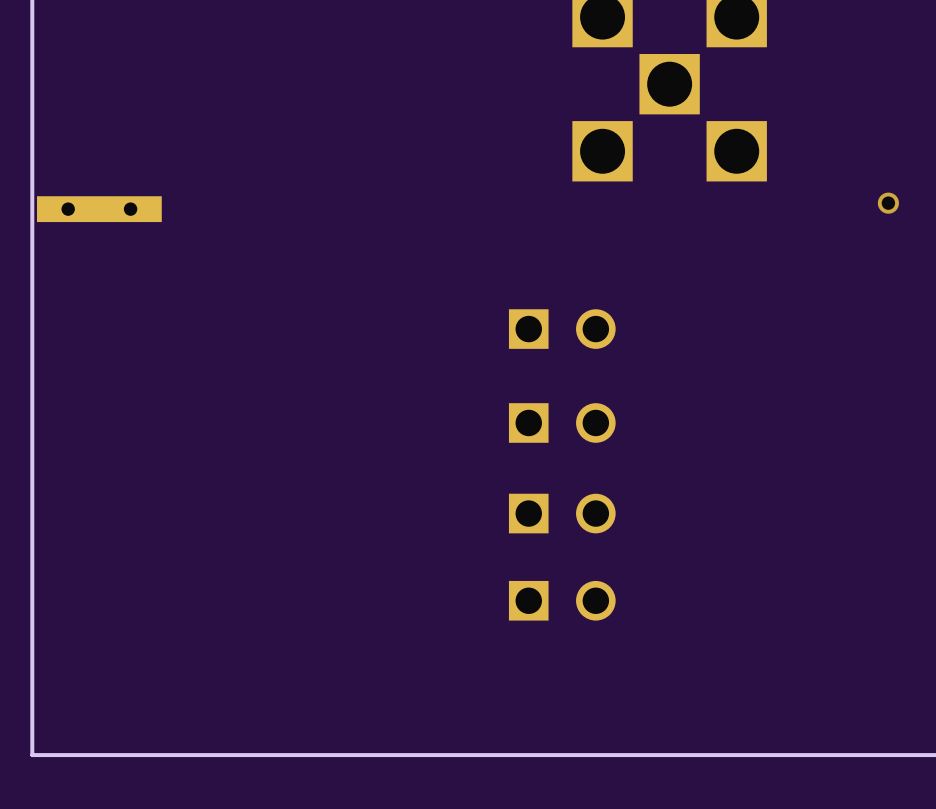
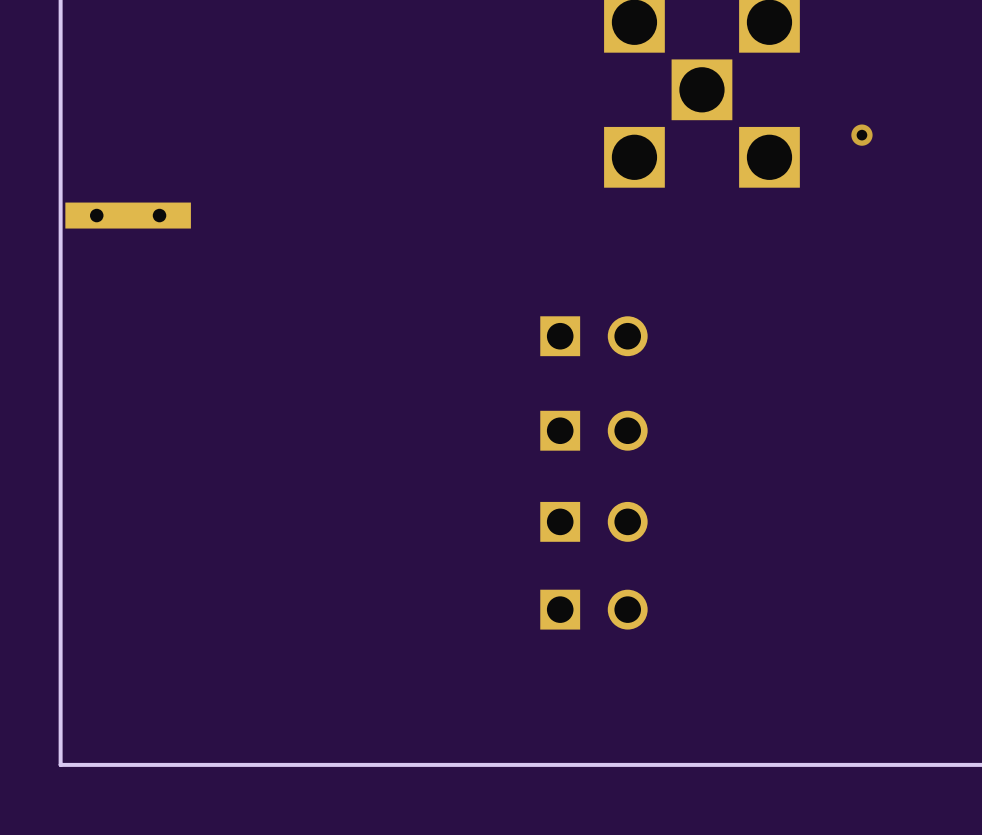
via: none -> (861, 135)
via: (888, 203) -> none

